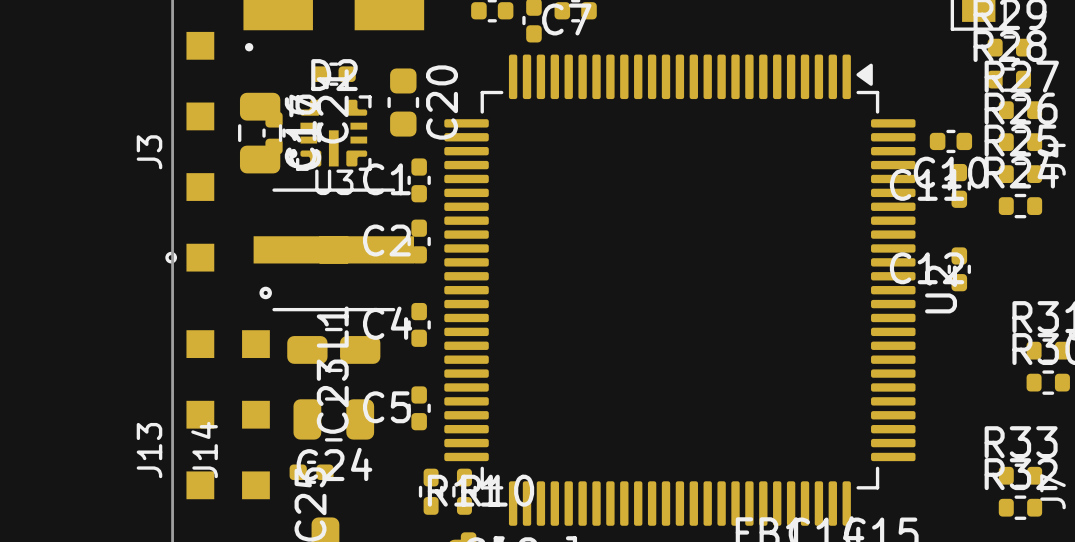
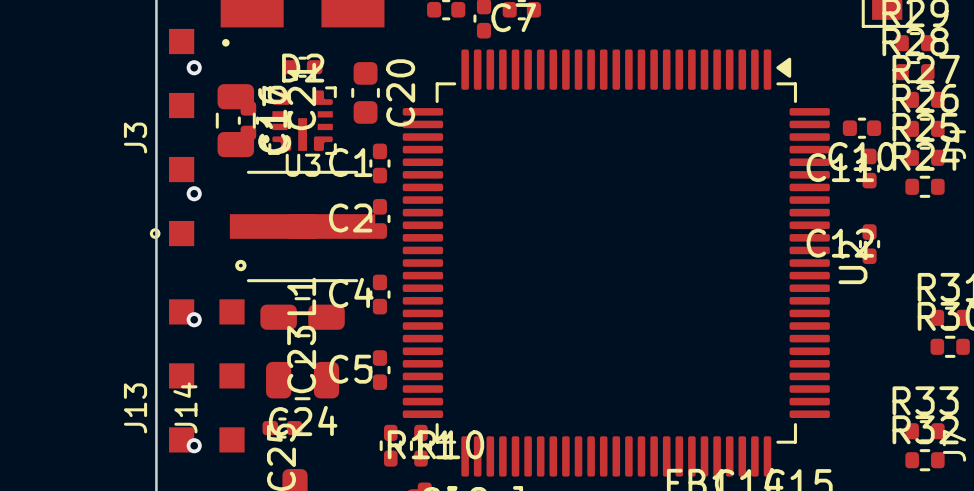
via: none -> (194, 67)
via: none -> (194, 193)
via: none -> (194, 319)
via: none -> (194, 445)

